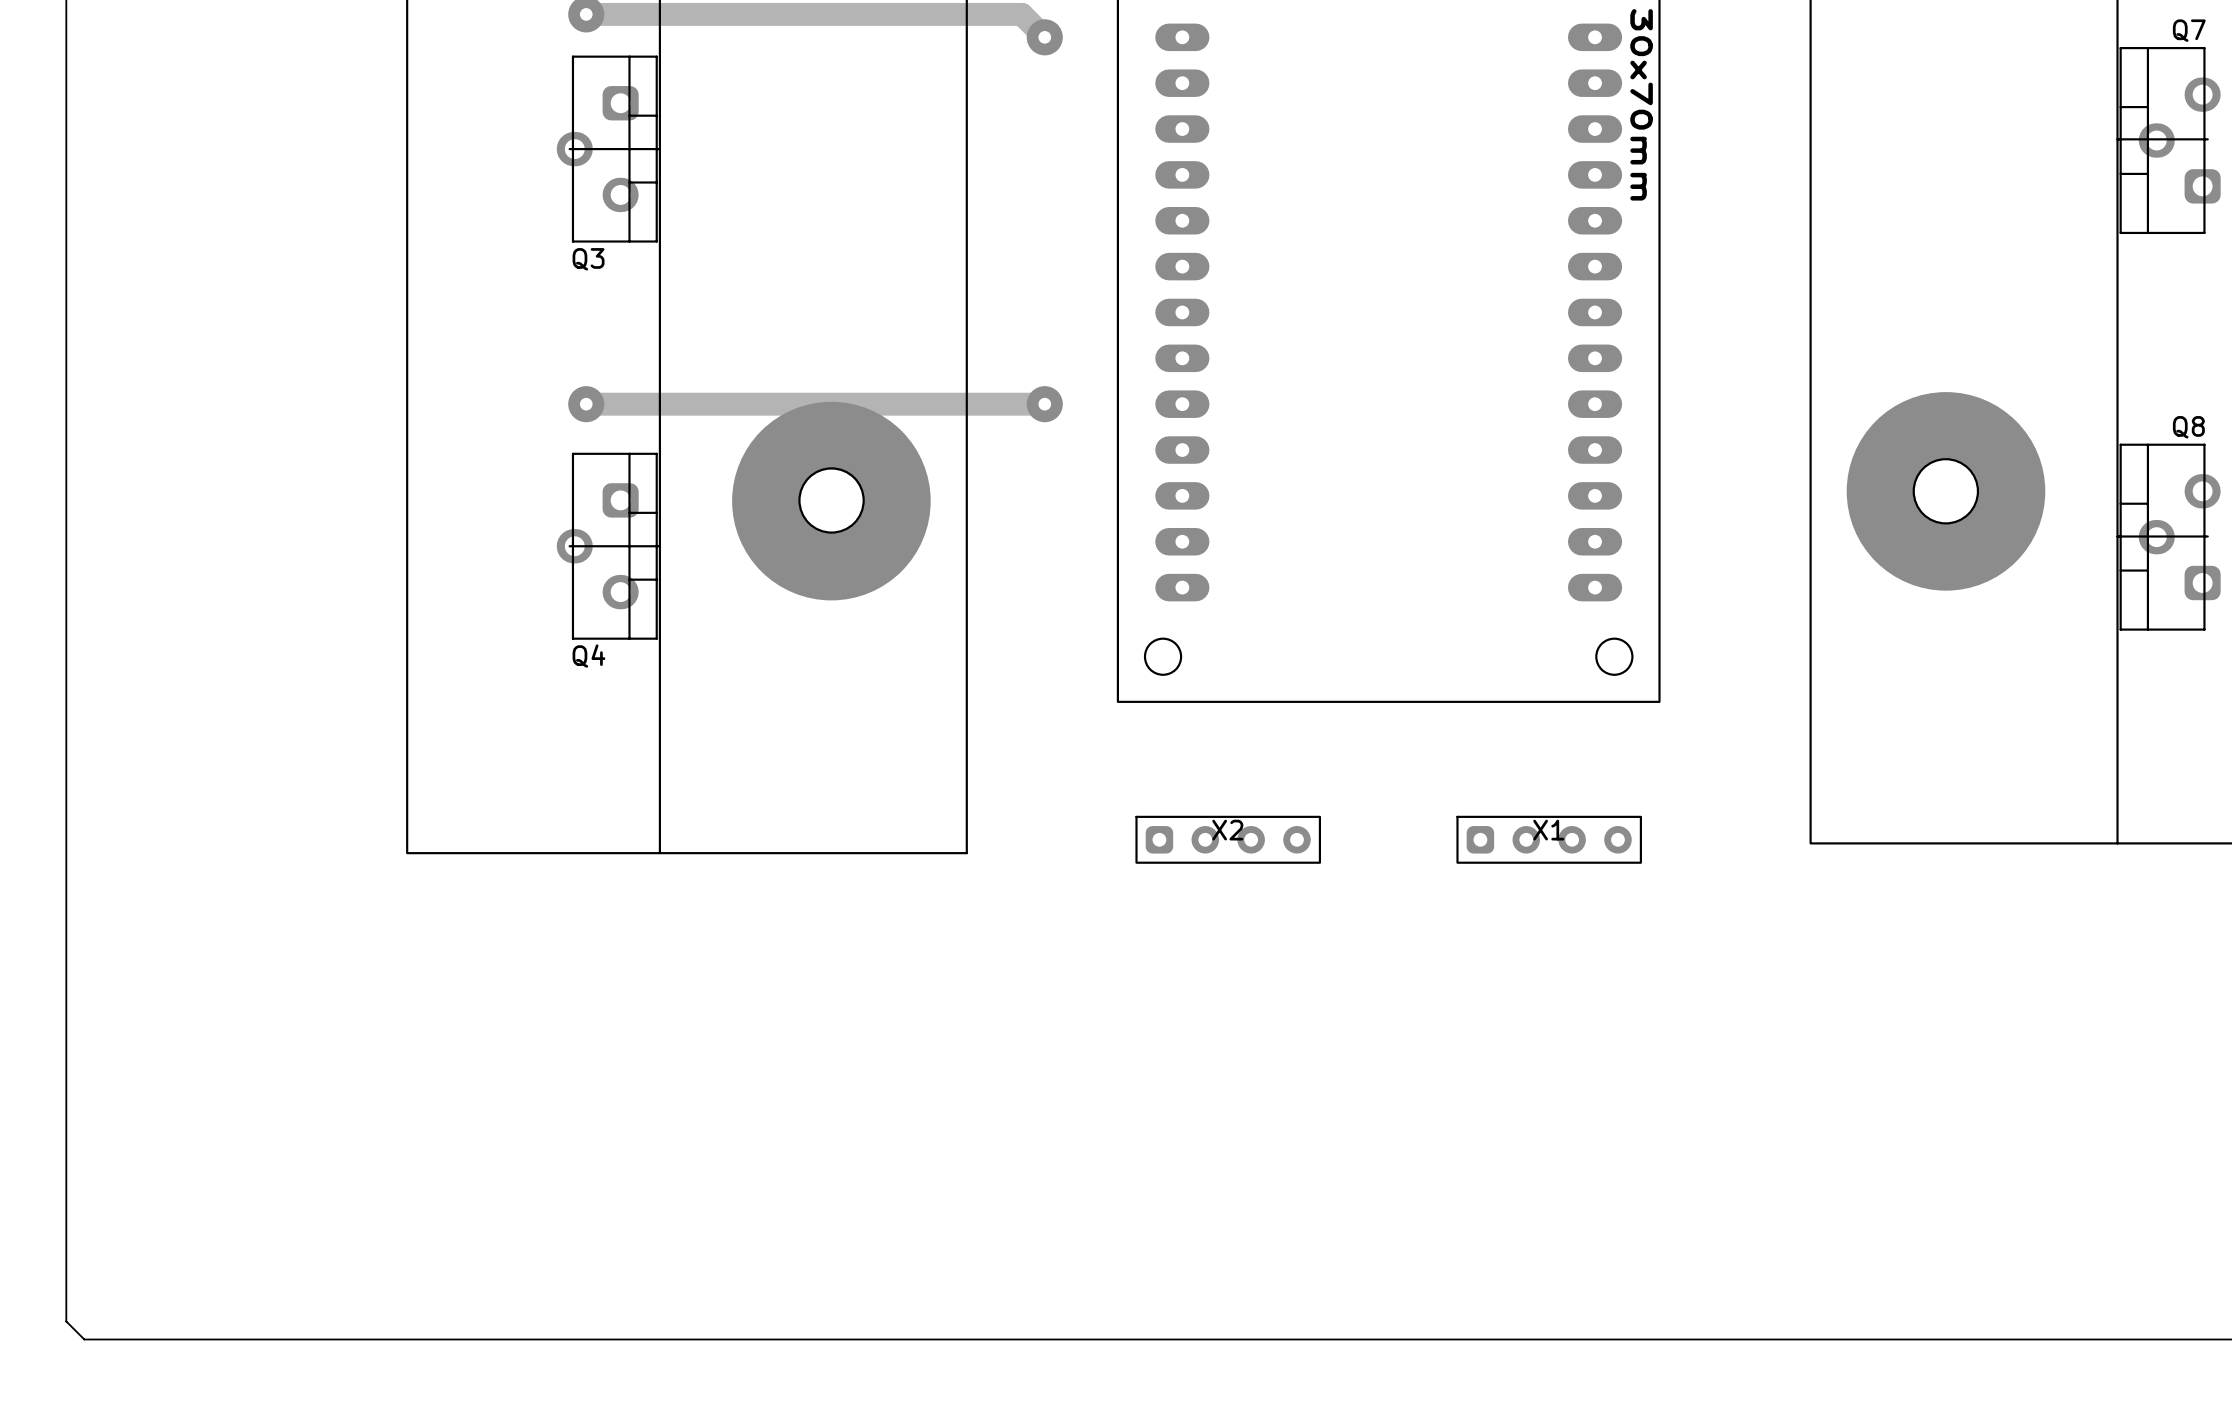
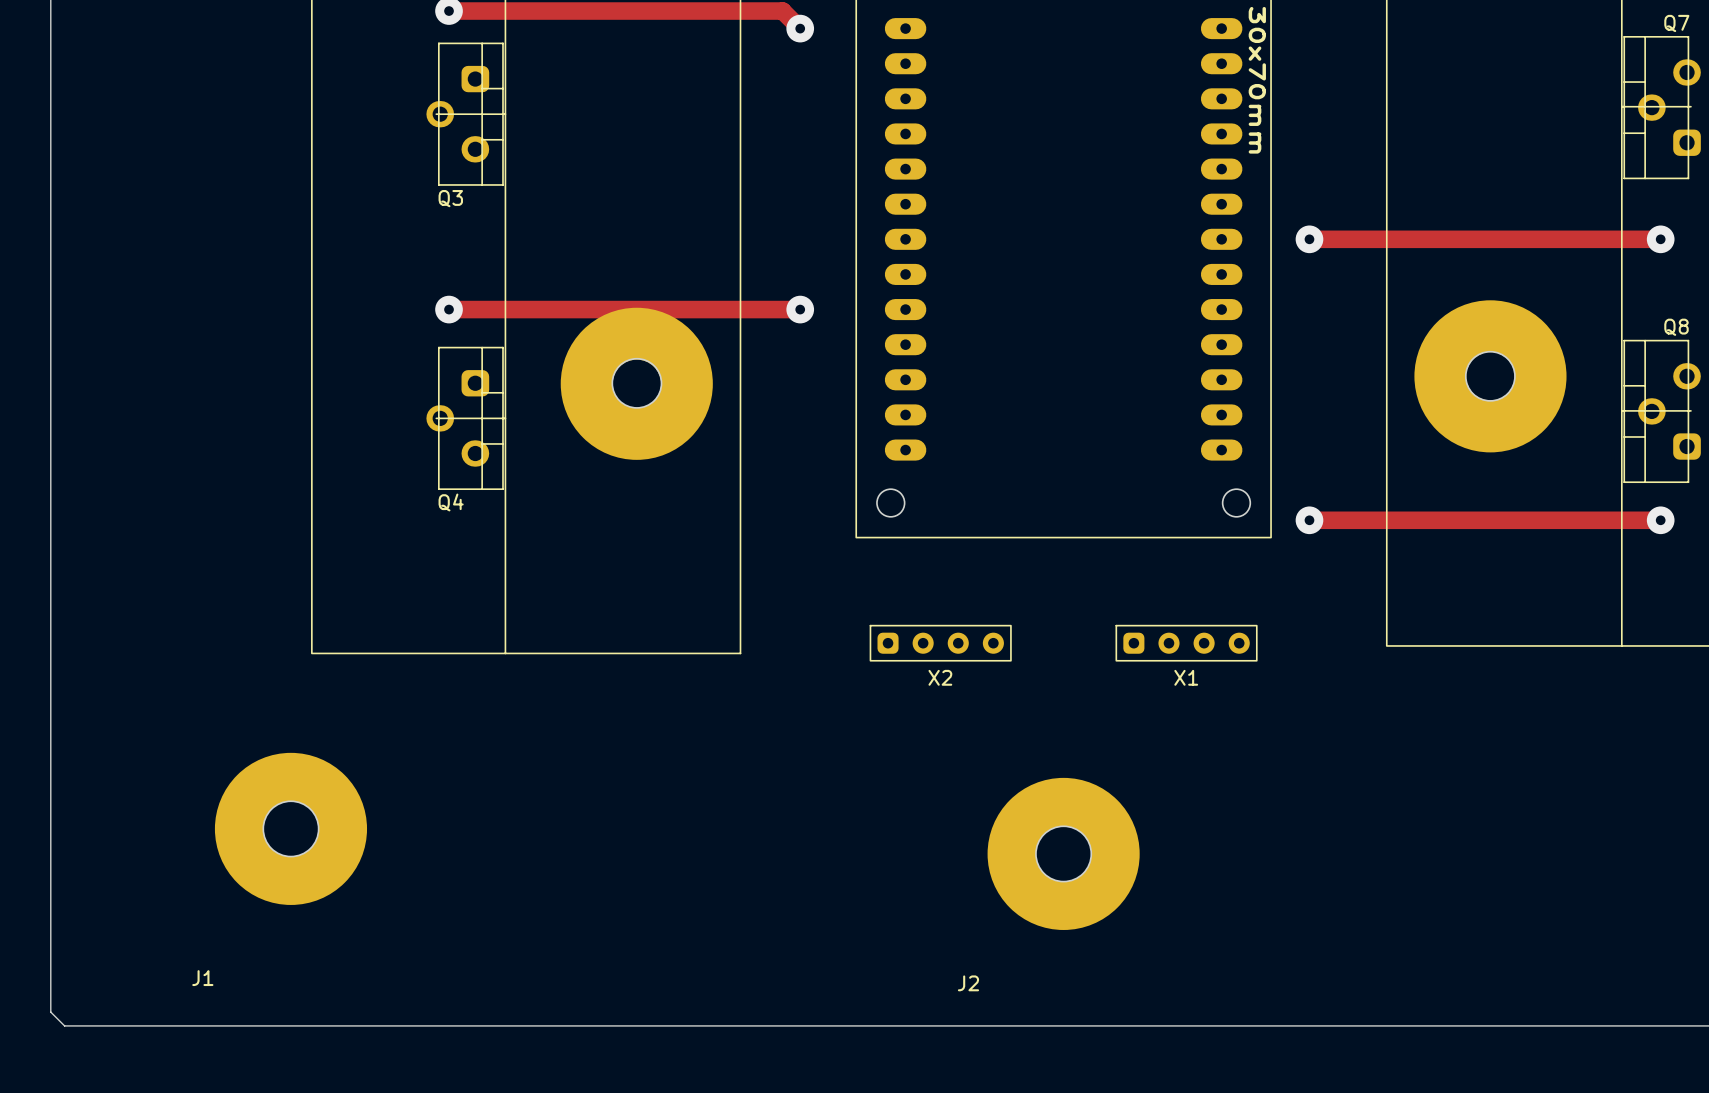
track: none -> (1309, 239) (1660, 239)
via: none -> (1309, 239)
via: none -> (1660, 239)
track: none -> (1309, 520) (1660, 520)
via: none -> (1309, 520)
via: none -> (1660, 520)
X2 name position: X2 (1227, 830) -> X2 (940, 677)
X1 name position: X1 (1548, 830) -> X1 (1186, 677)
J1: none -> (290, 828)
J2: none -> (1063, 853)

